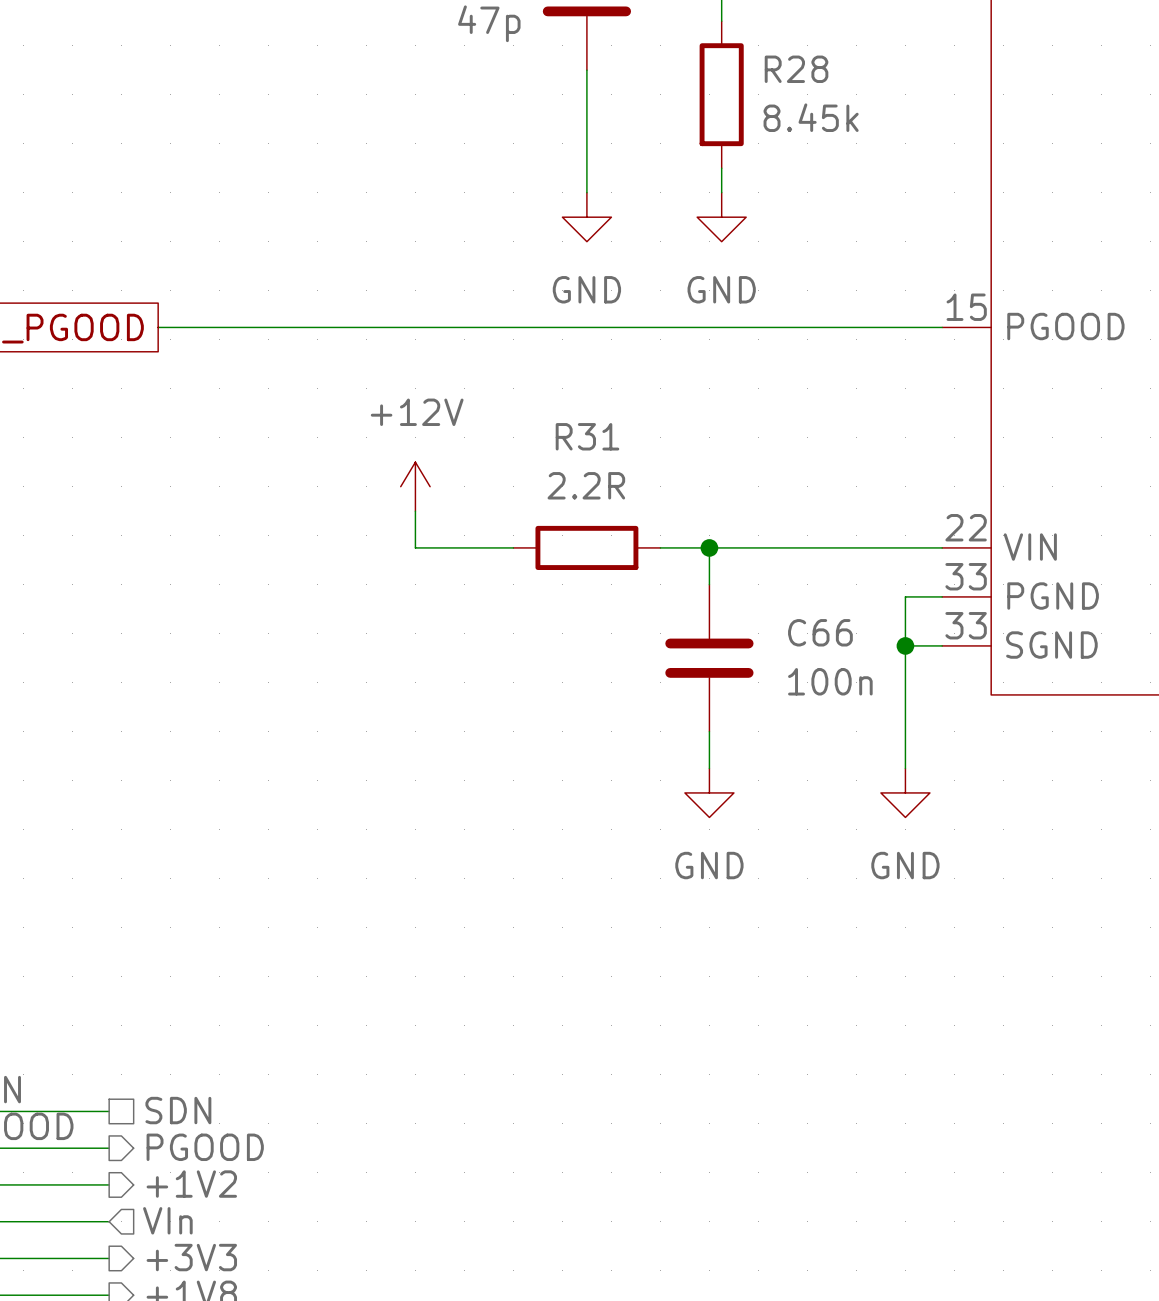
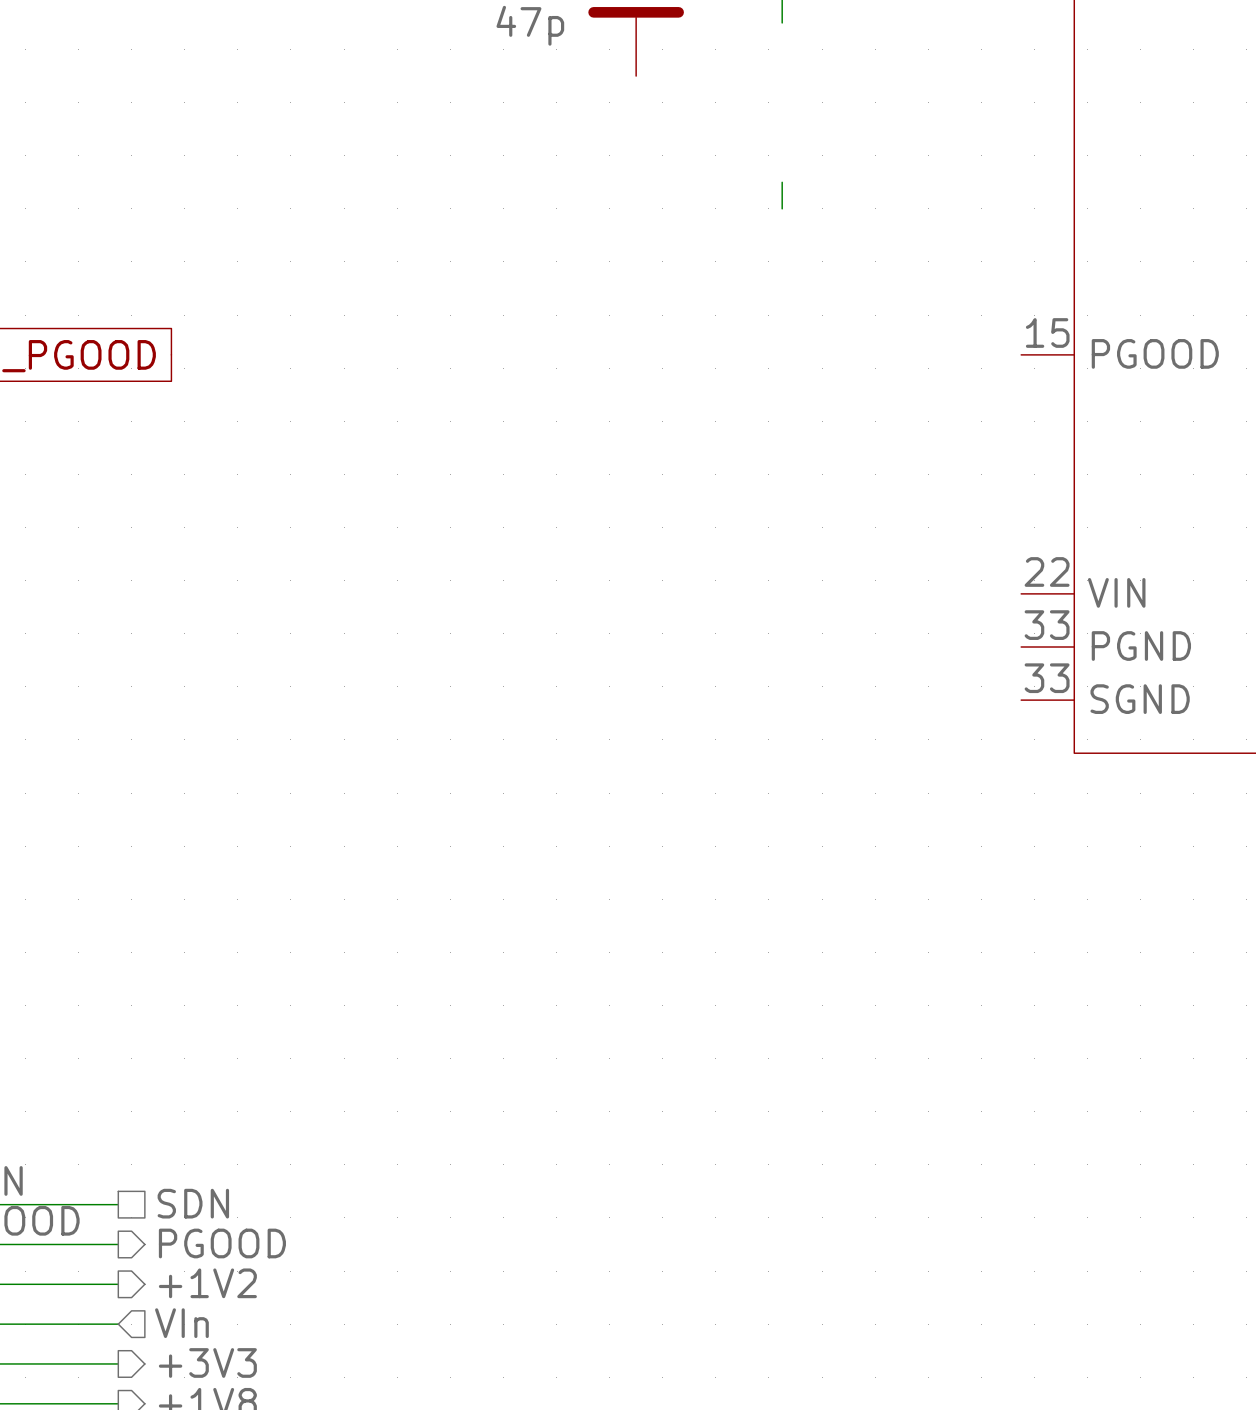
wire: (586, 70) (586, 192) -> none
R28: 8.45k (721, 94) -> none
power symbol: GND (586, 217) -> none
power symbol: GND (721, 217) -> none
wire: (158, 327) (942, 327) -> none
power symbol: +12V (415, 486) -> none
wire: (415, 511) (415, 547) (513, 547) -> none
R31: 2.2R (586, 547) -> none
wire: (660, 547) (942, 547) -> none
wire: (709, 547) (709, 584) -> none
junction: (709, 547) -> none
wire: (942, 596) (905, 596) (905, 768) -> none
wire: (905, 645) (942, 645) -> none
junction: (905, 645) -> none
C66: 100n (709, 658) -> none
wire: (709, 731) (709, 768) -> none
power symbol: GND (709, 792) -> none
power symbol: GND (905, 792) -> none

